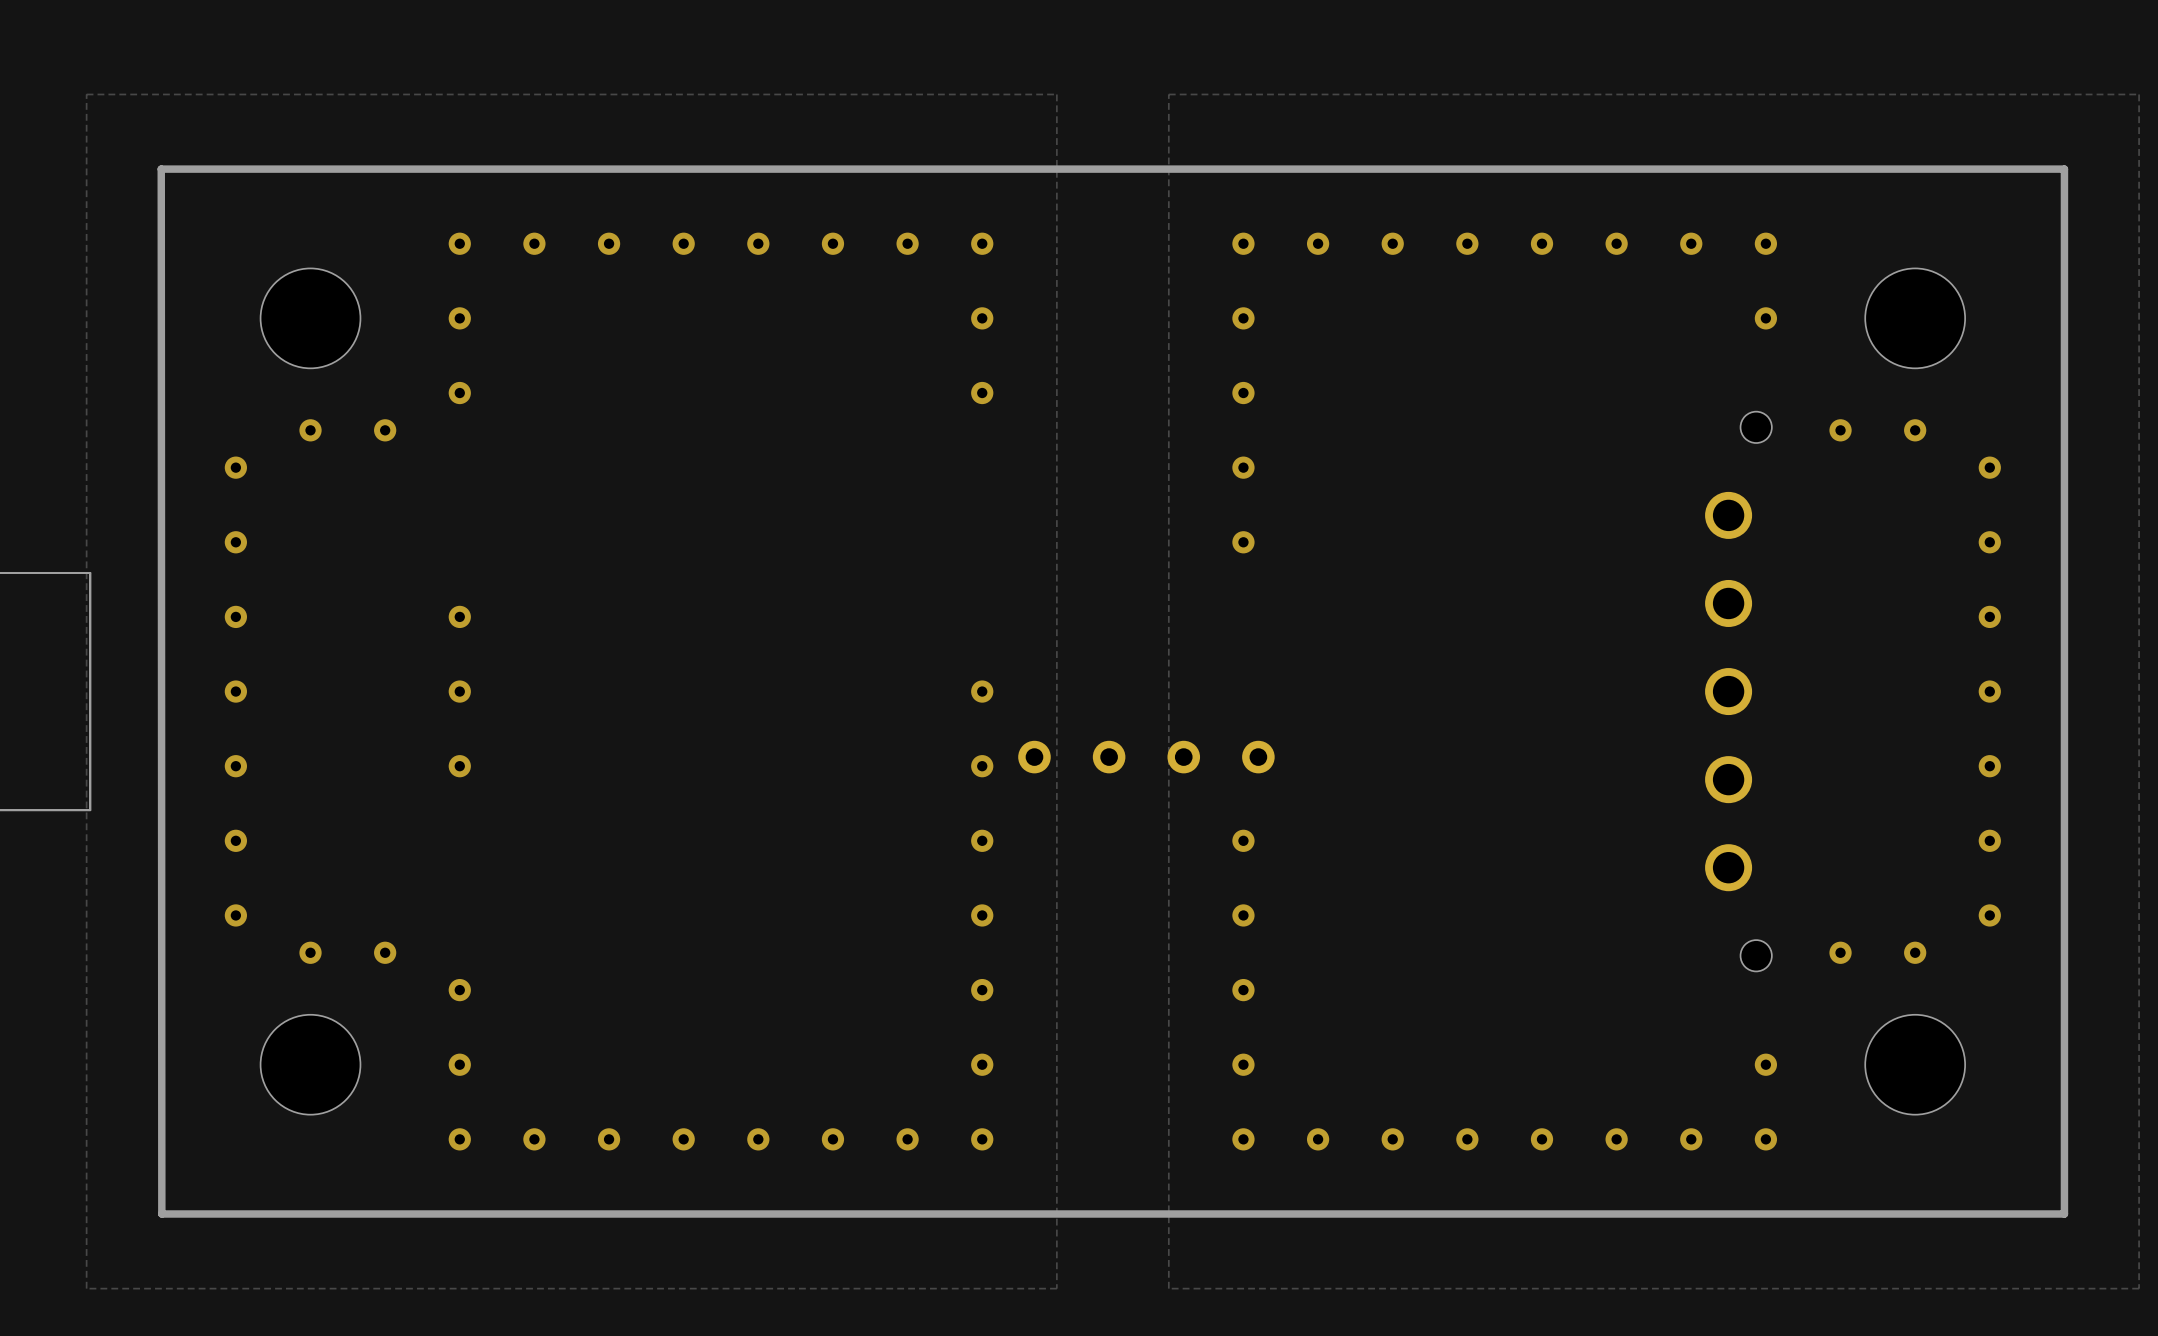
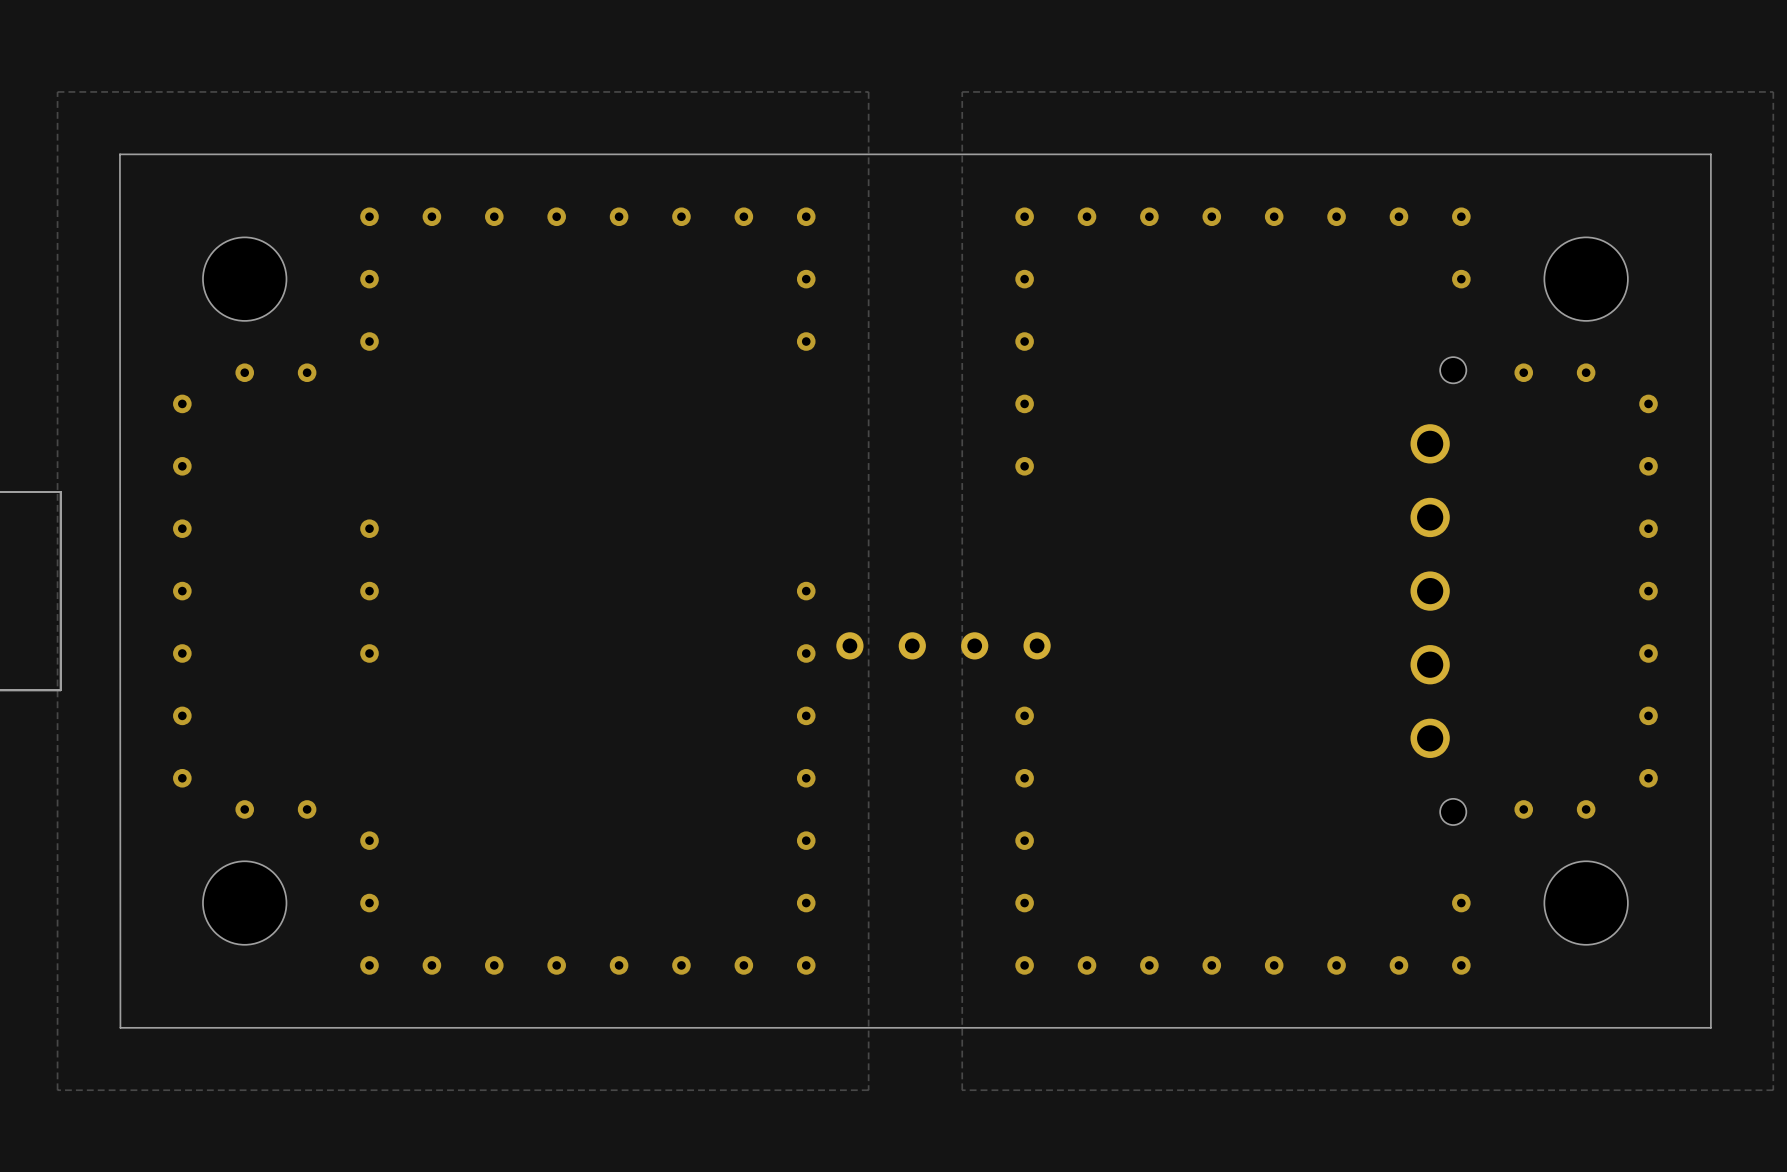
board edge width: thick (2064, 169) (161, 169) (161, 1214) (2064, 1214) (2064, 169) -> thin (1710, 154) (119, 154) (120, 1027) (1710, 1027) (1710, 154)

